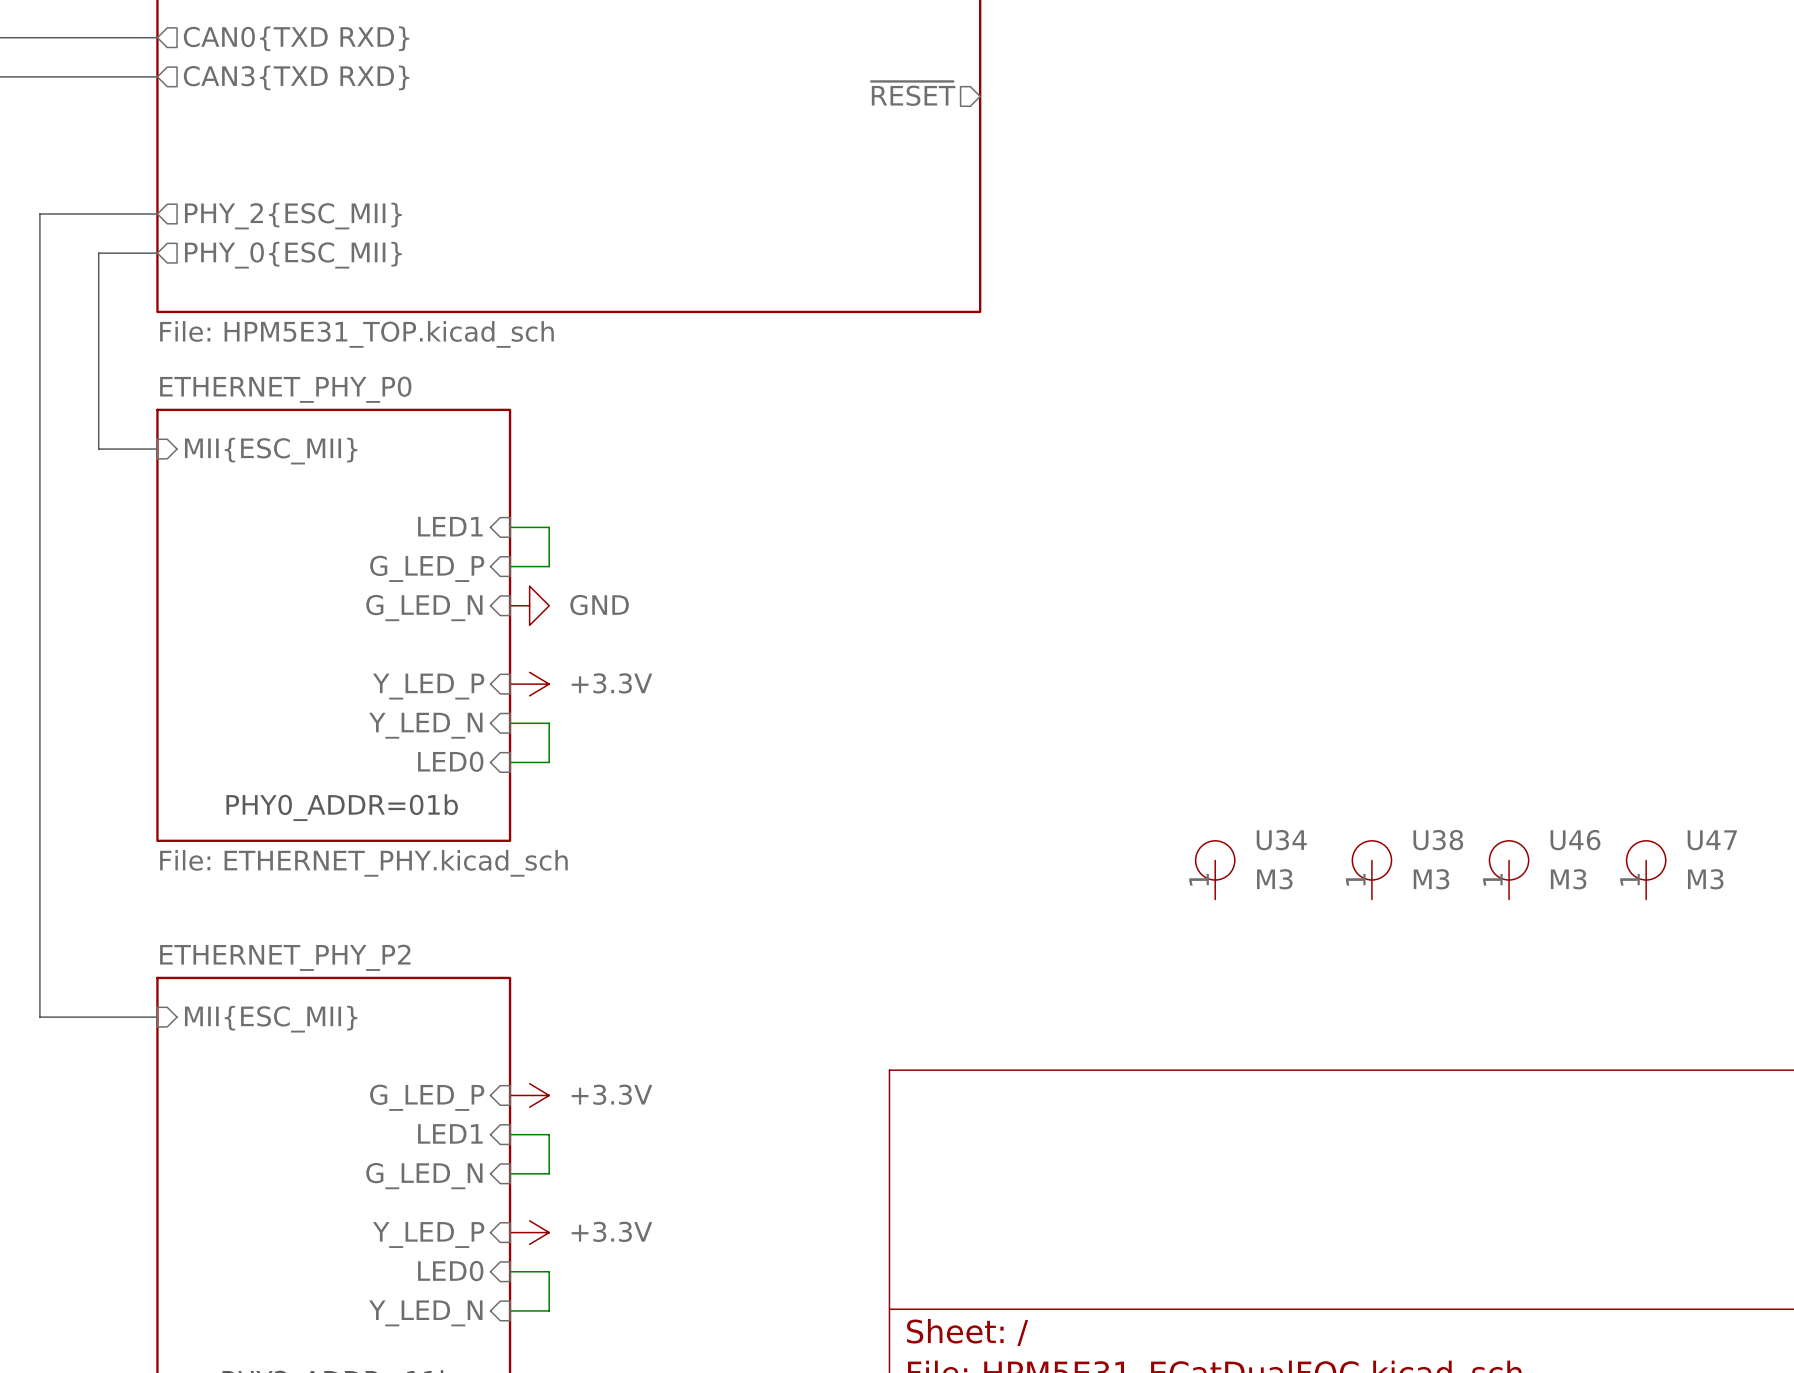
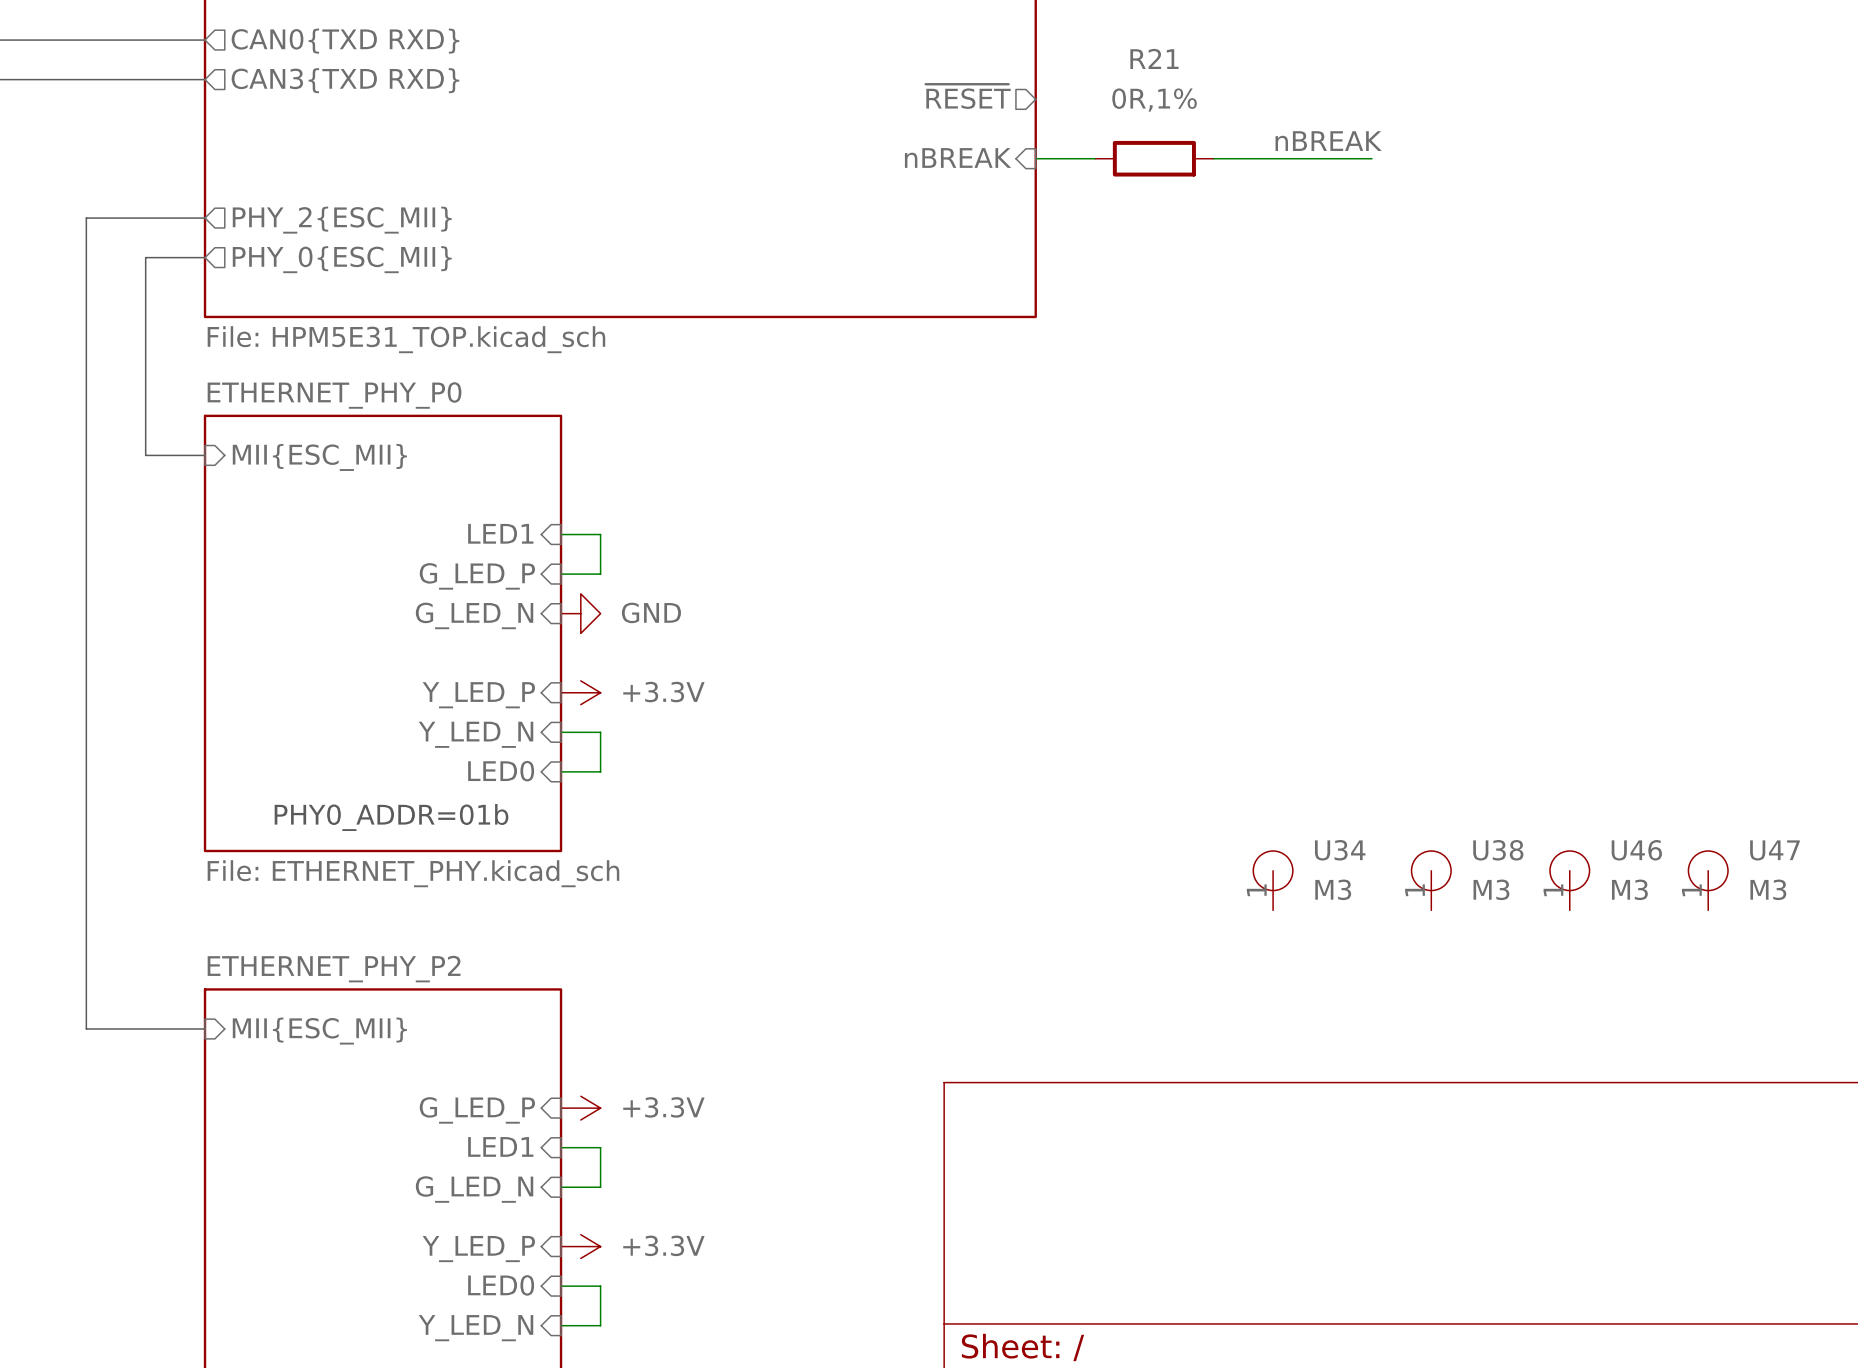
label: none -> nBREAK (1328, 141)
sheet pin: none -> nBREAK (958, 157)
wire: none -> (1035, 158) (1095, 158)
R21: none -> 0R,1% (1154, 158)
wire: none -> (1213, 158) (1371, 158)

